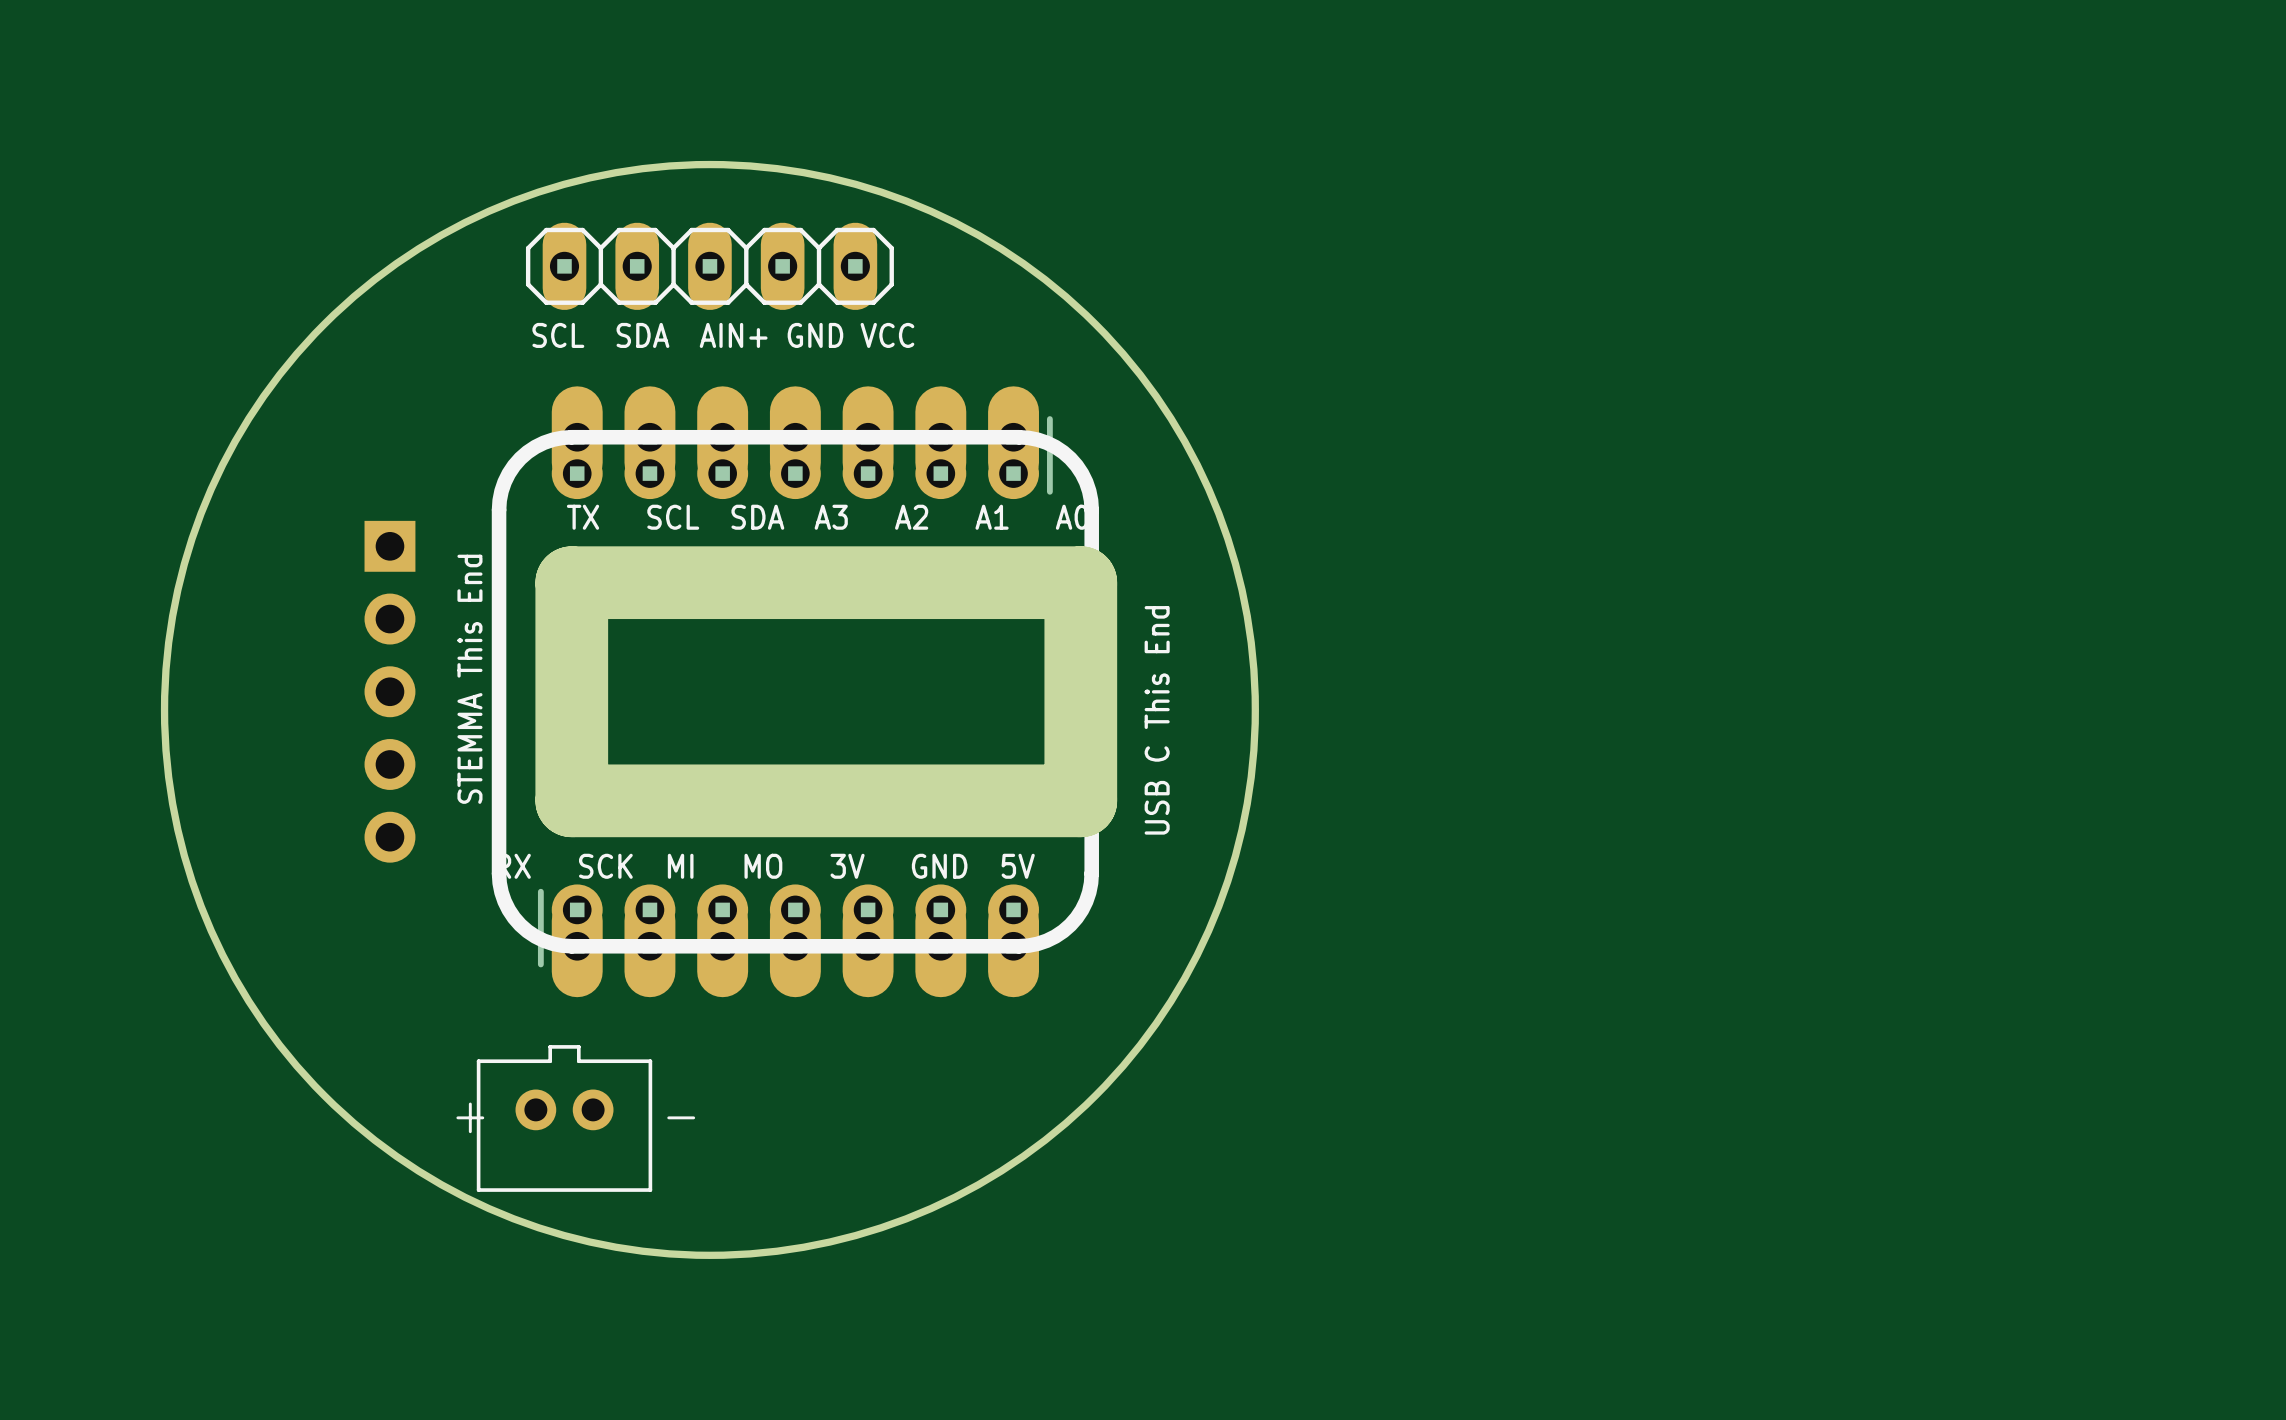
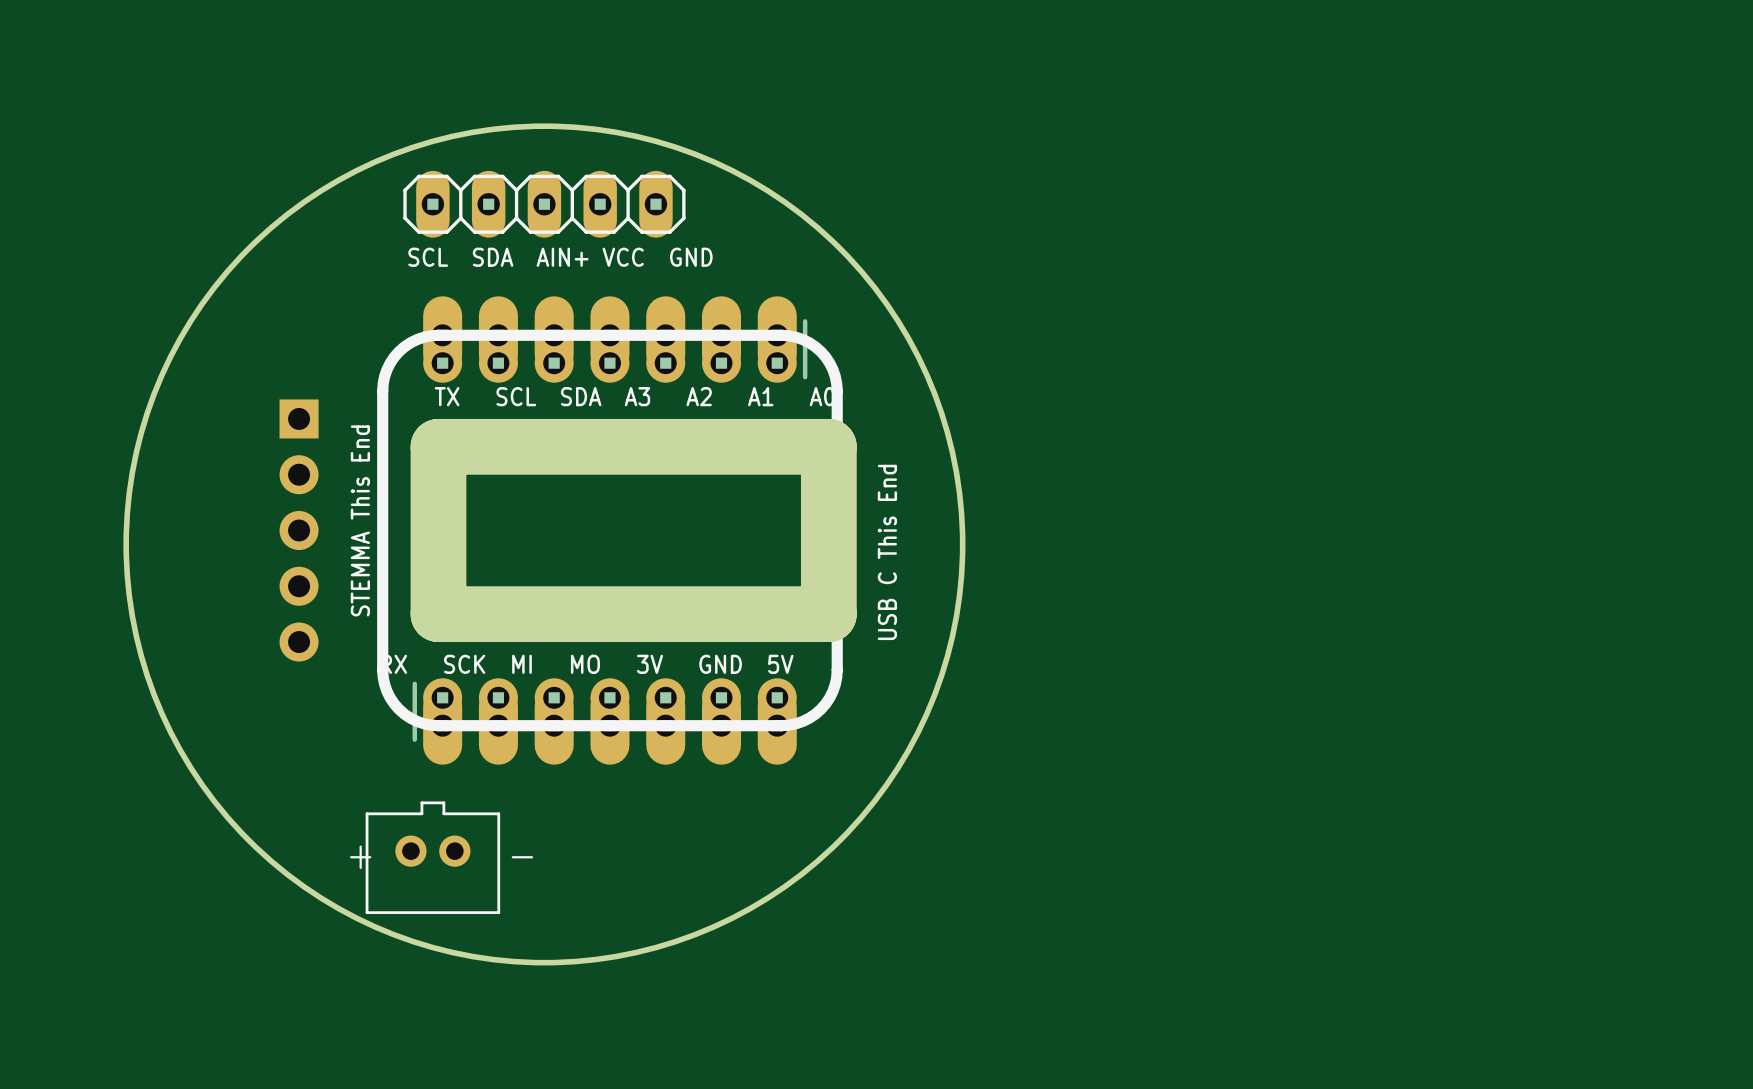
text: SCL SDA AIN+ GND VCC (723, 335) -> SCL SDA AIN+ VCC GND (560, 257)

